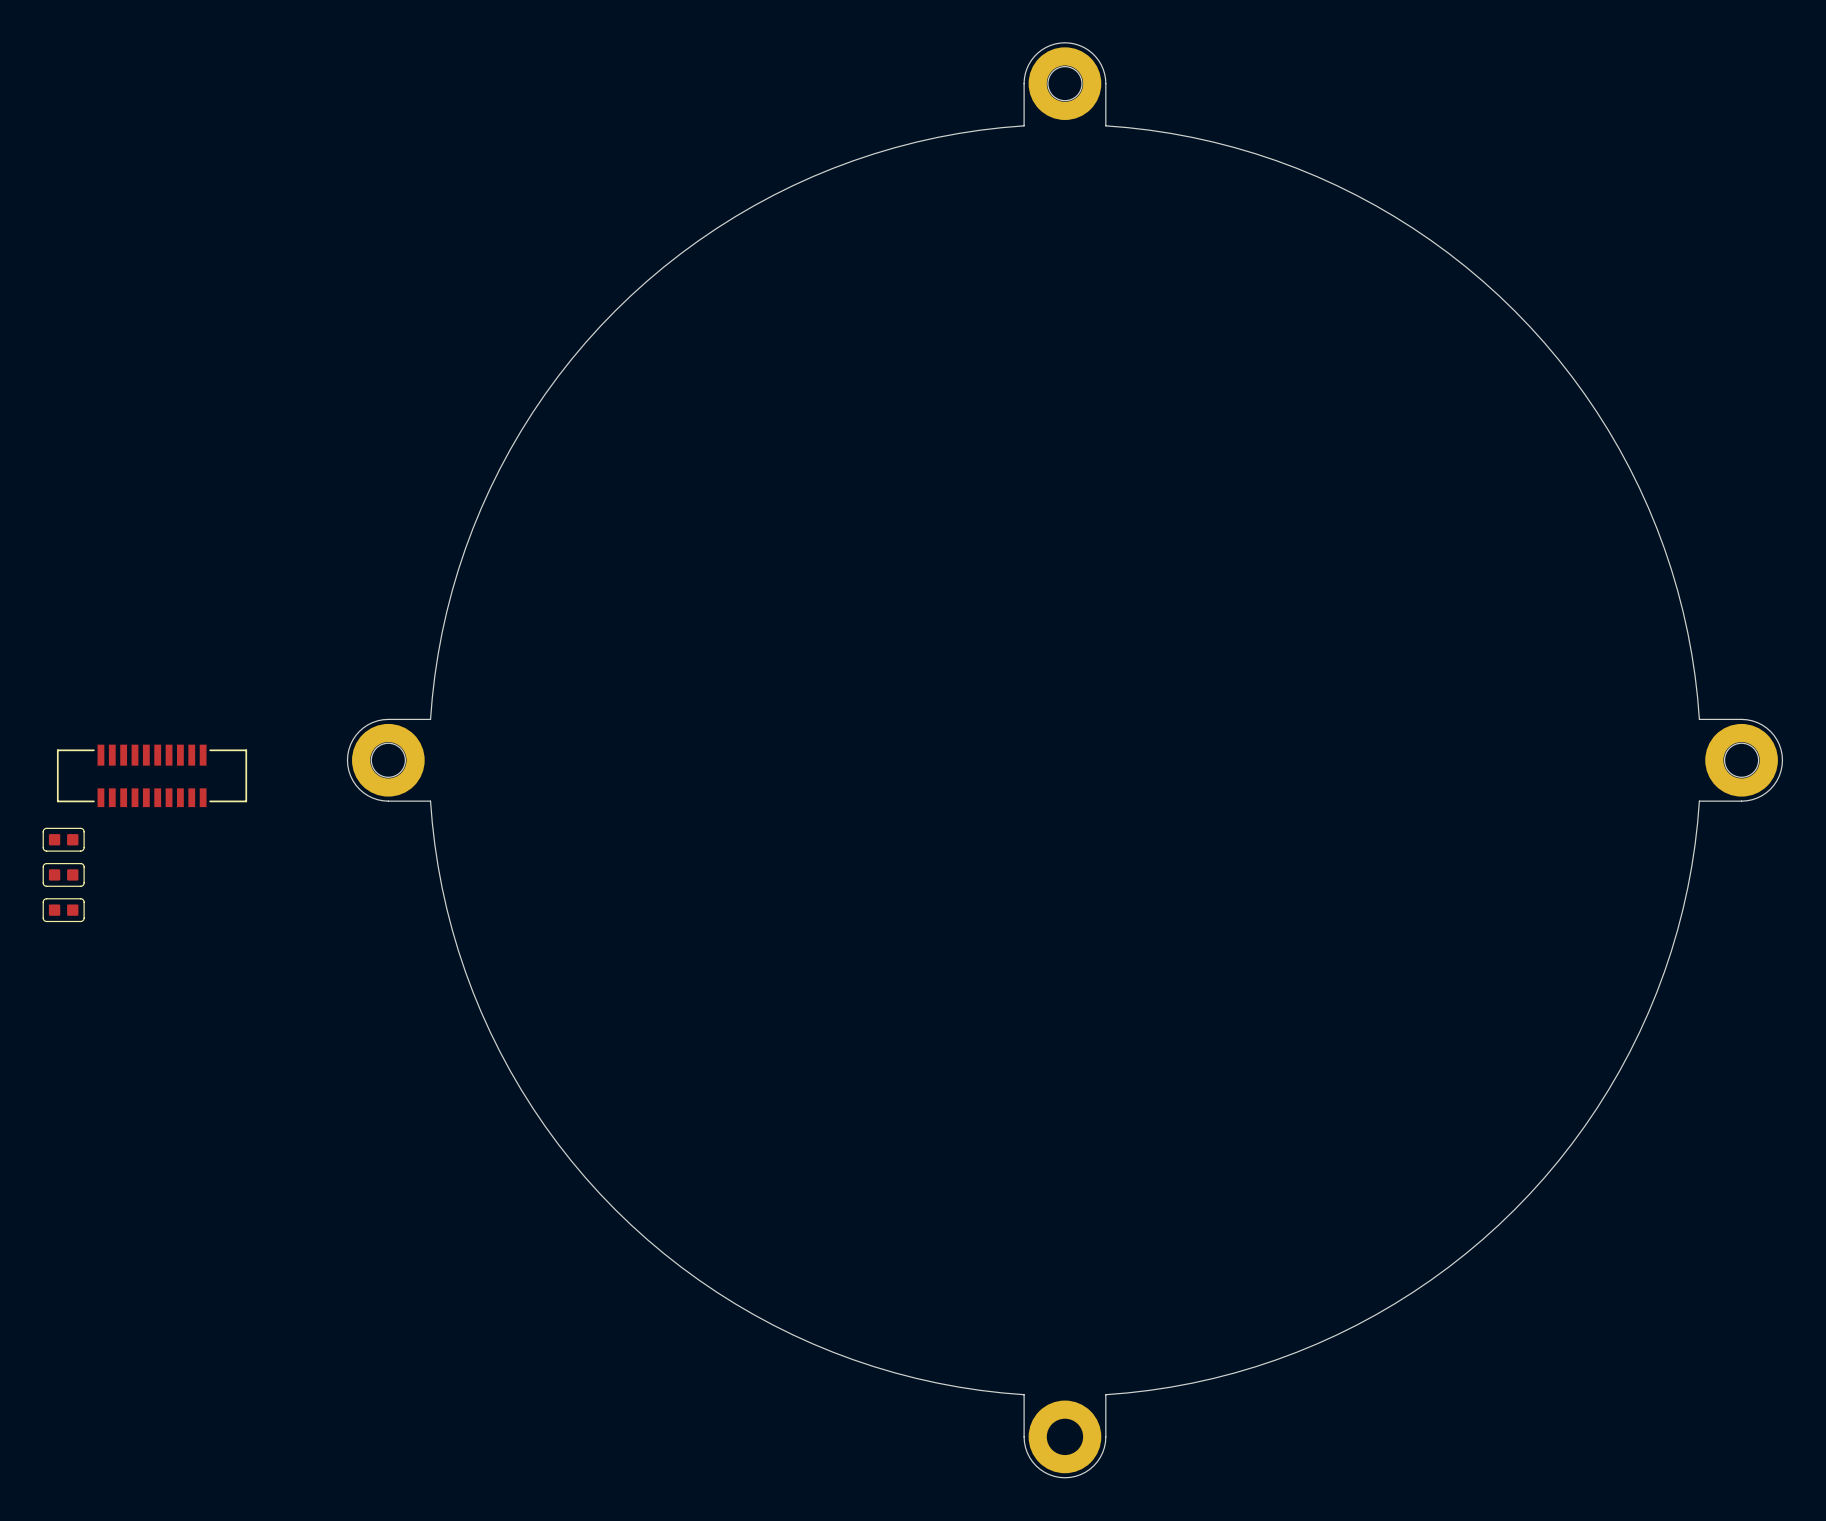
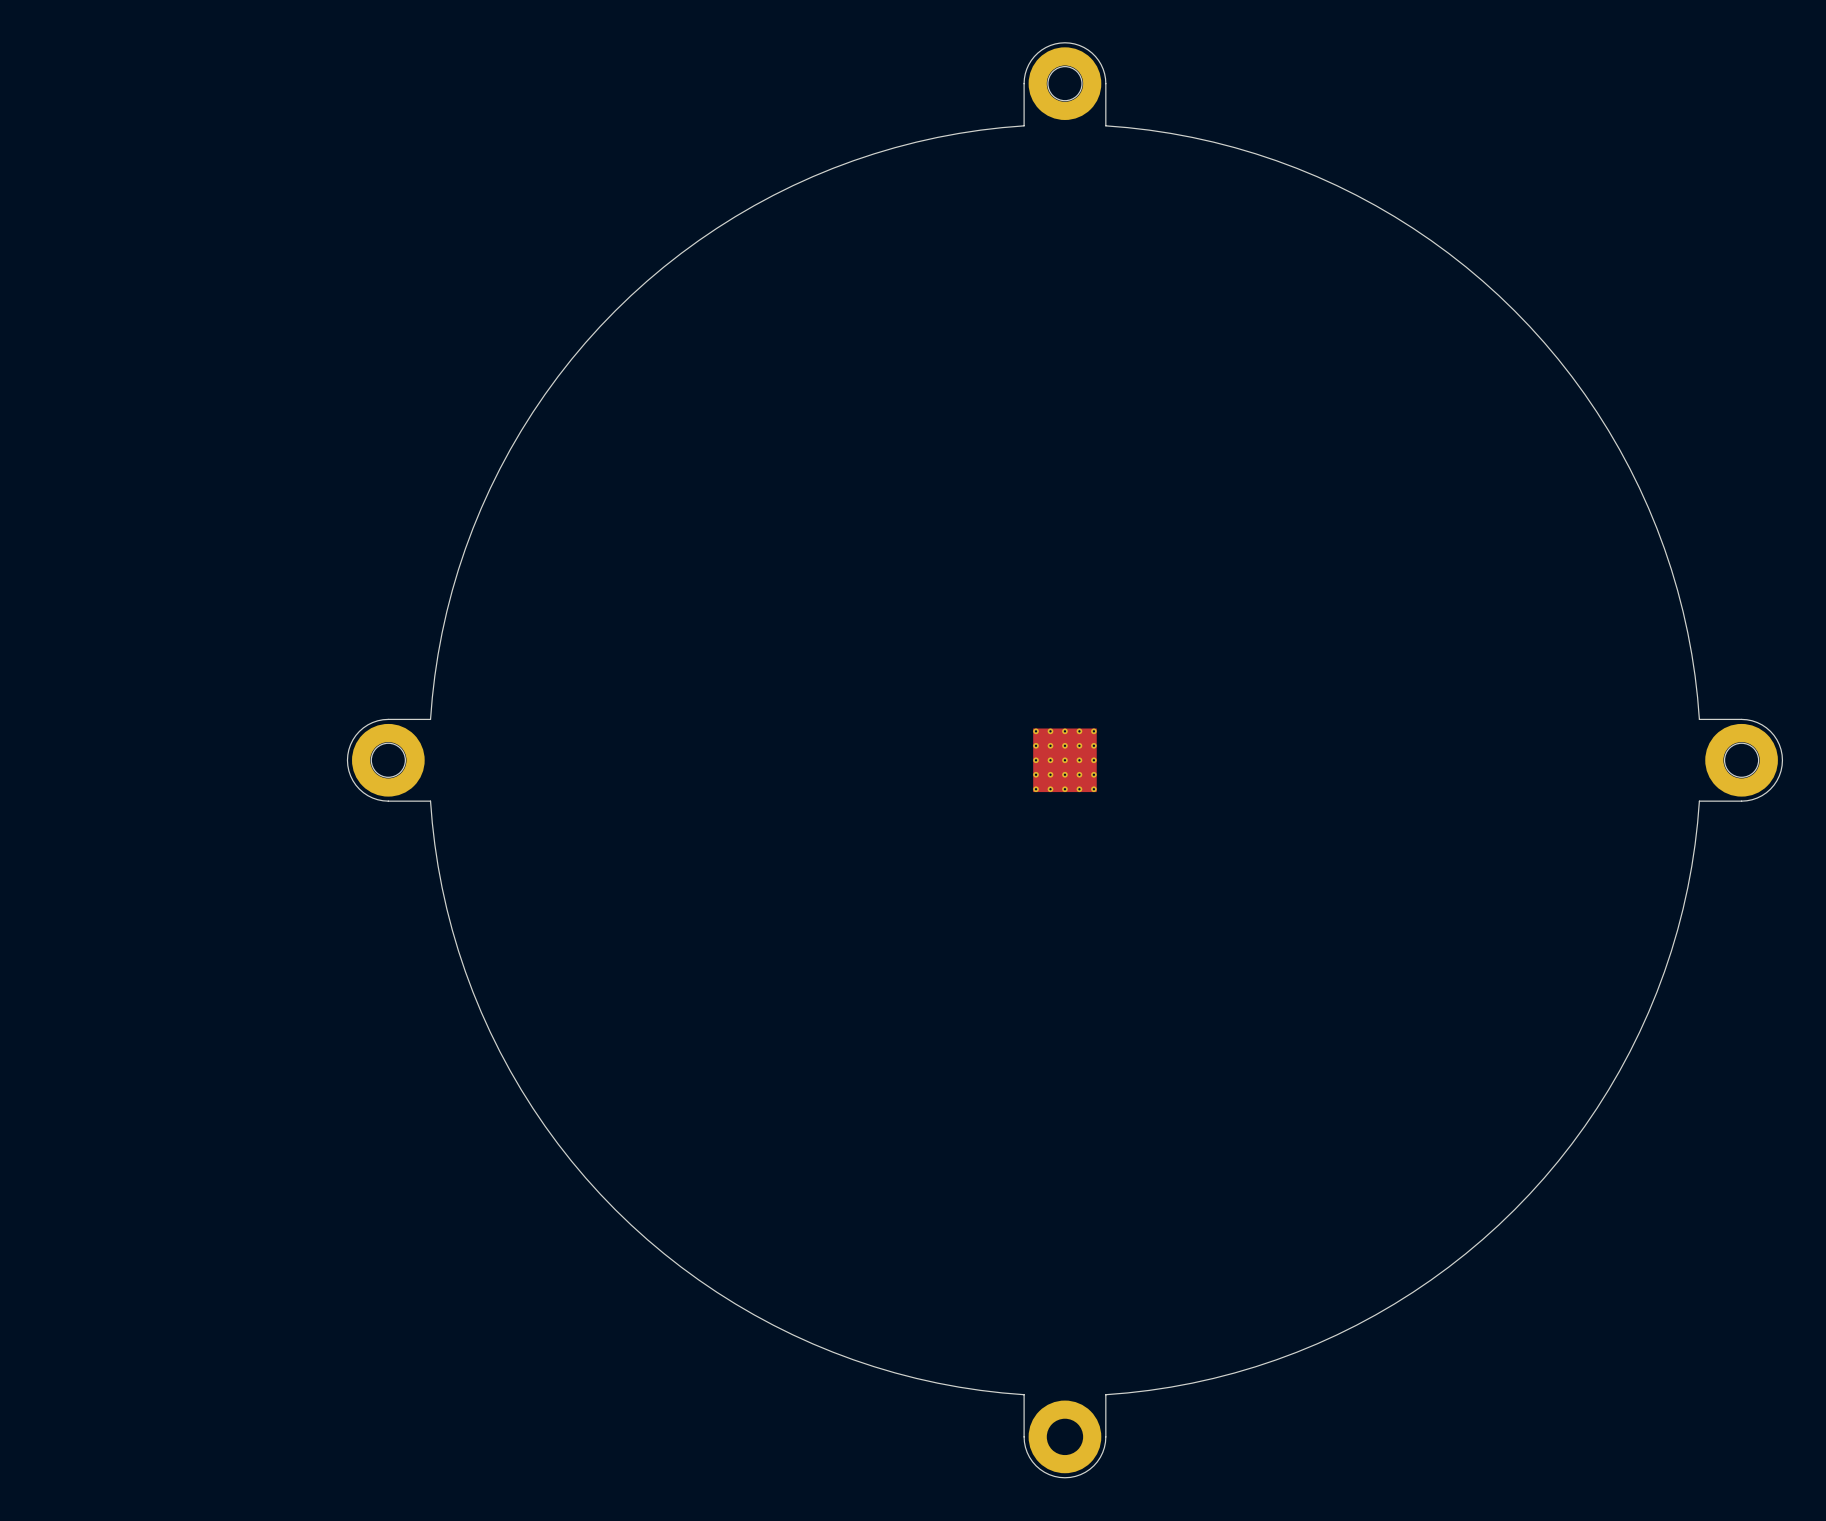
part: none -> (1064, 760)
part: (152, 775) -> none
part: (63, 839) -> none
part: (63, 874) -> none
part: (63, 910) -> none

